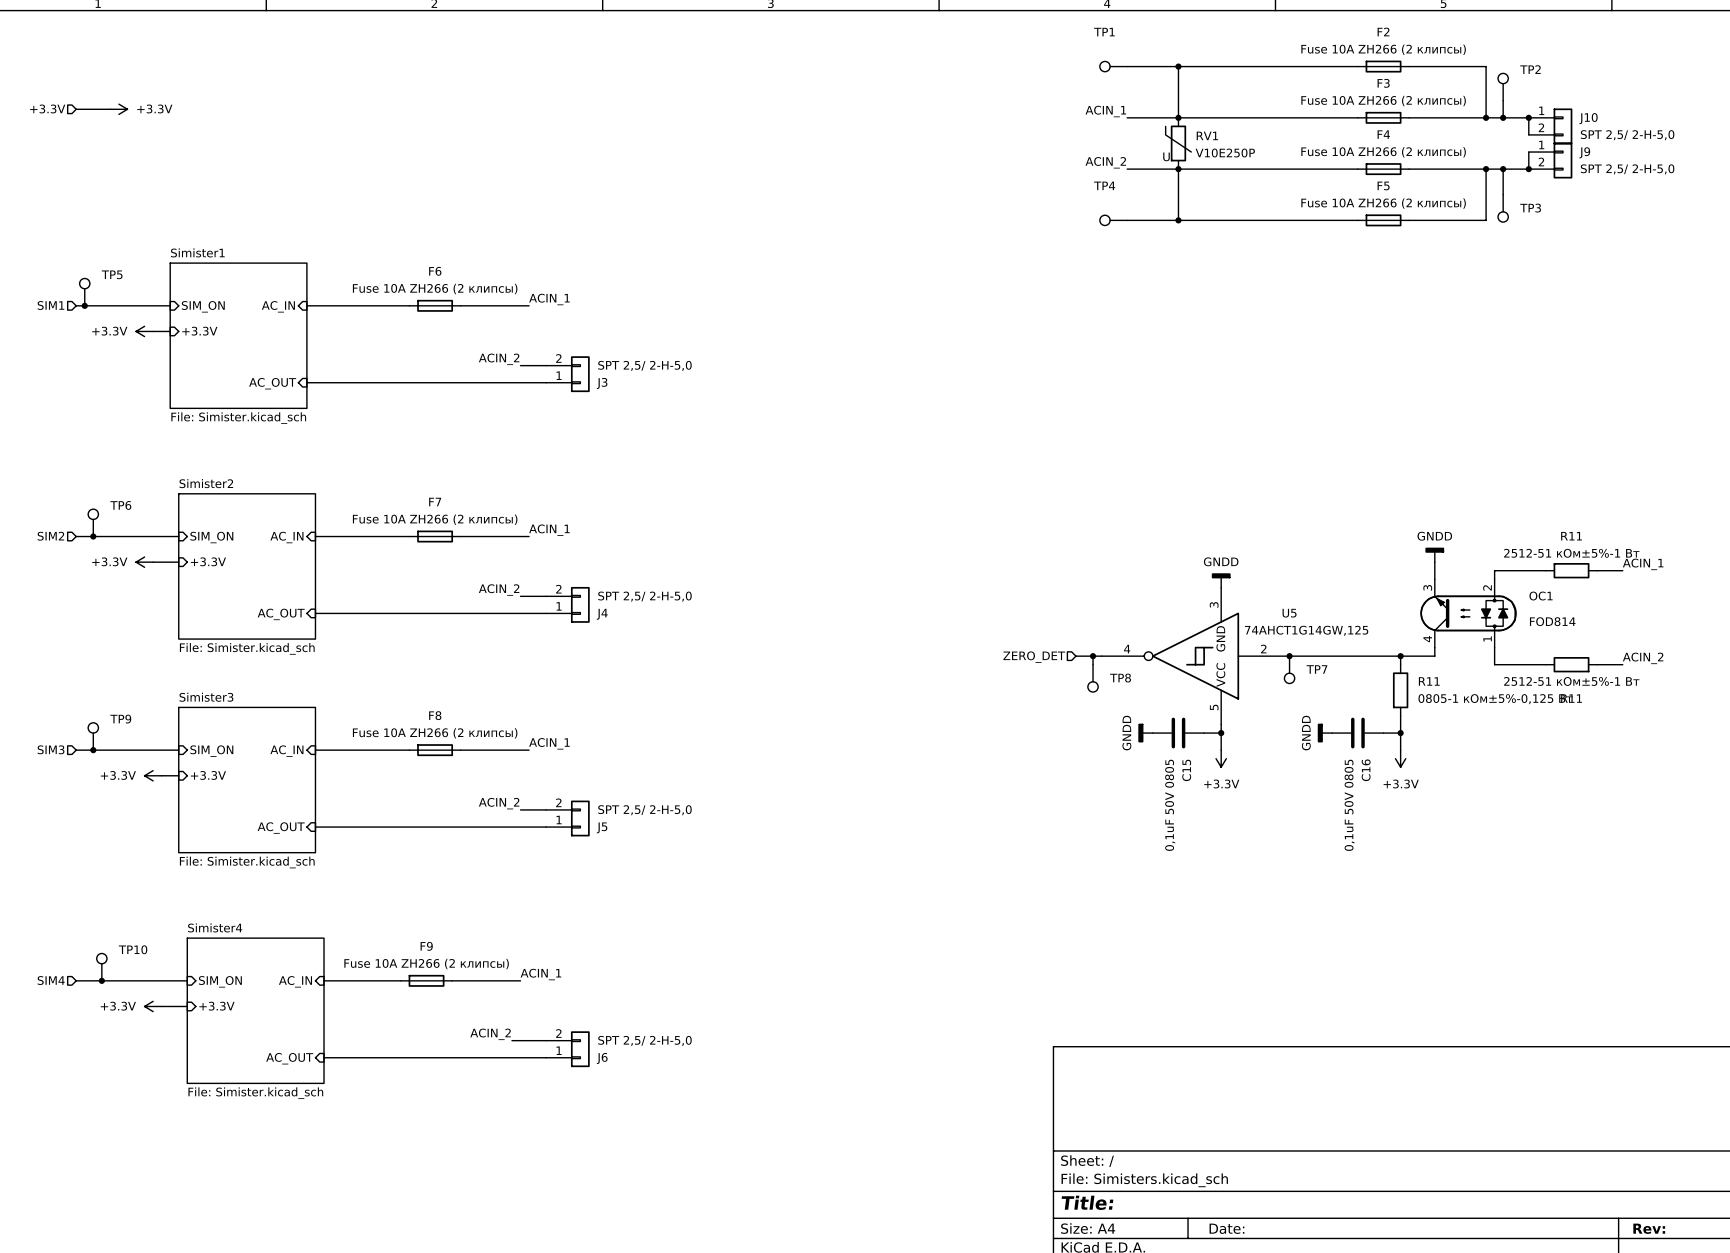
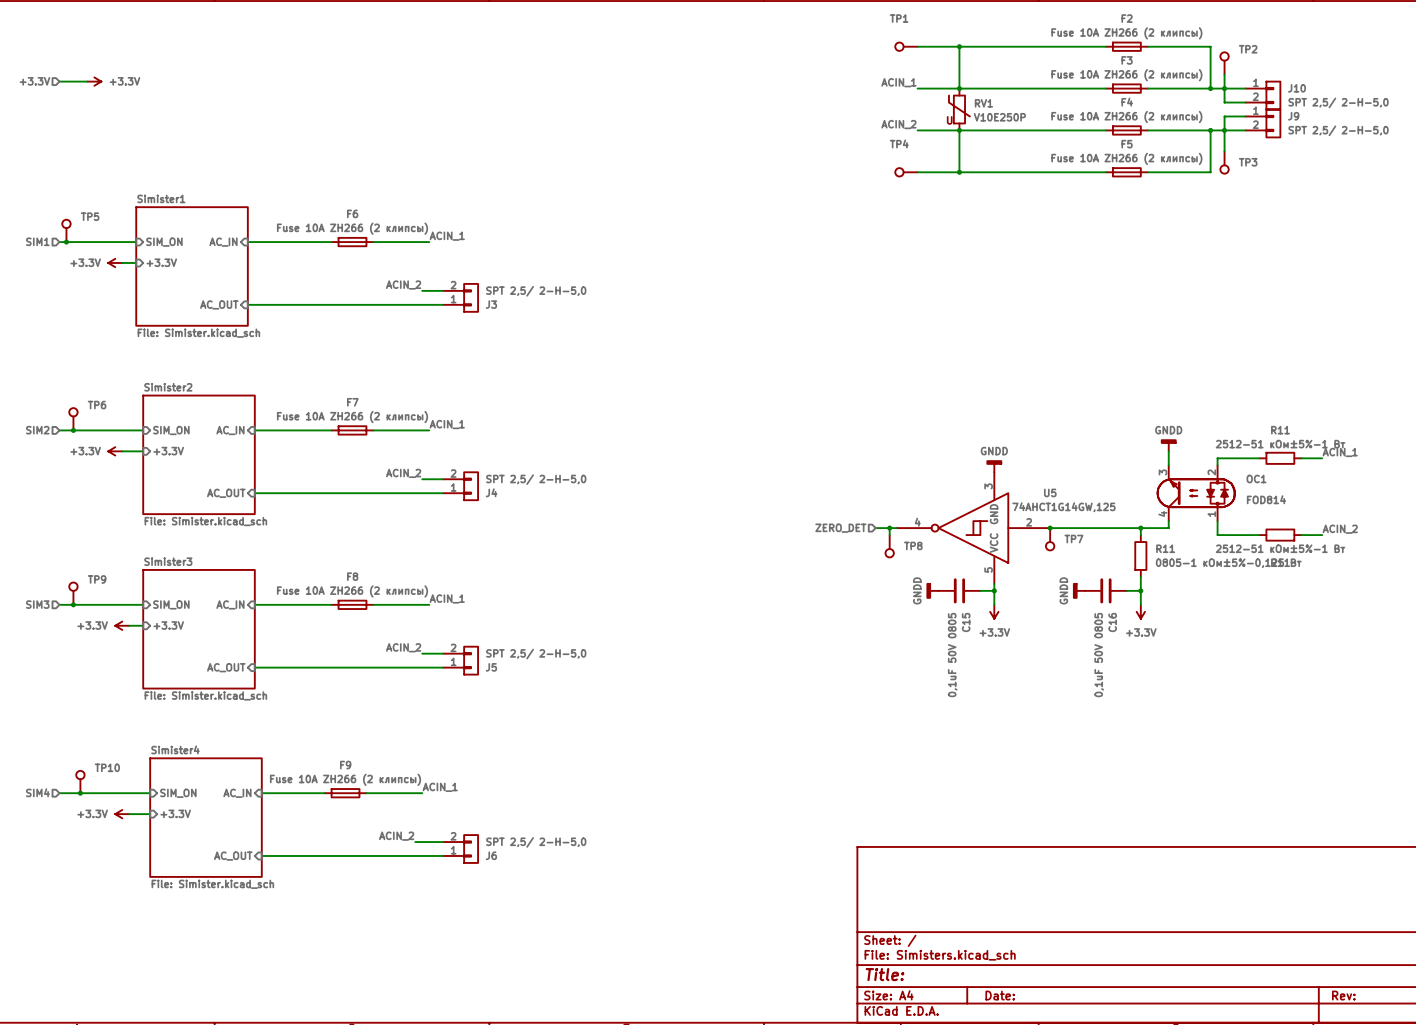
wire: (1528, 117) (1528, 134) -> (1224, 88) (1224, 102) (1245, 102)
junction: (1528, 117) -> none
wire: (1528, 152) (1528, 169) -> (1245, 116) (1224, 116) (1224, 130)
junction: (1528, 169) -> none

